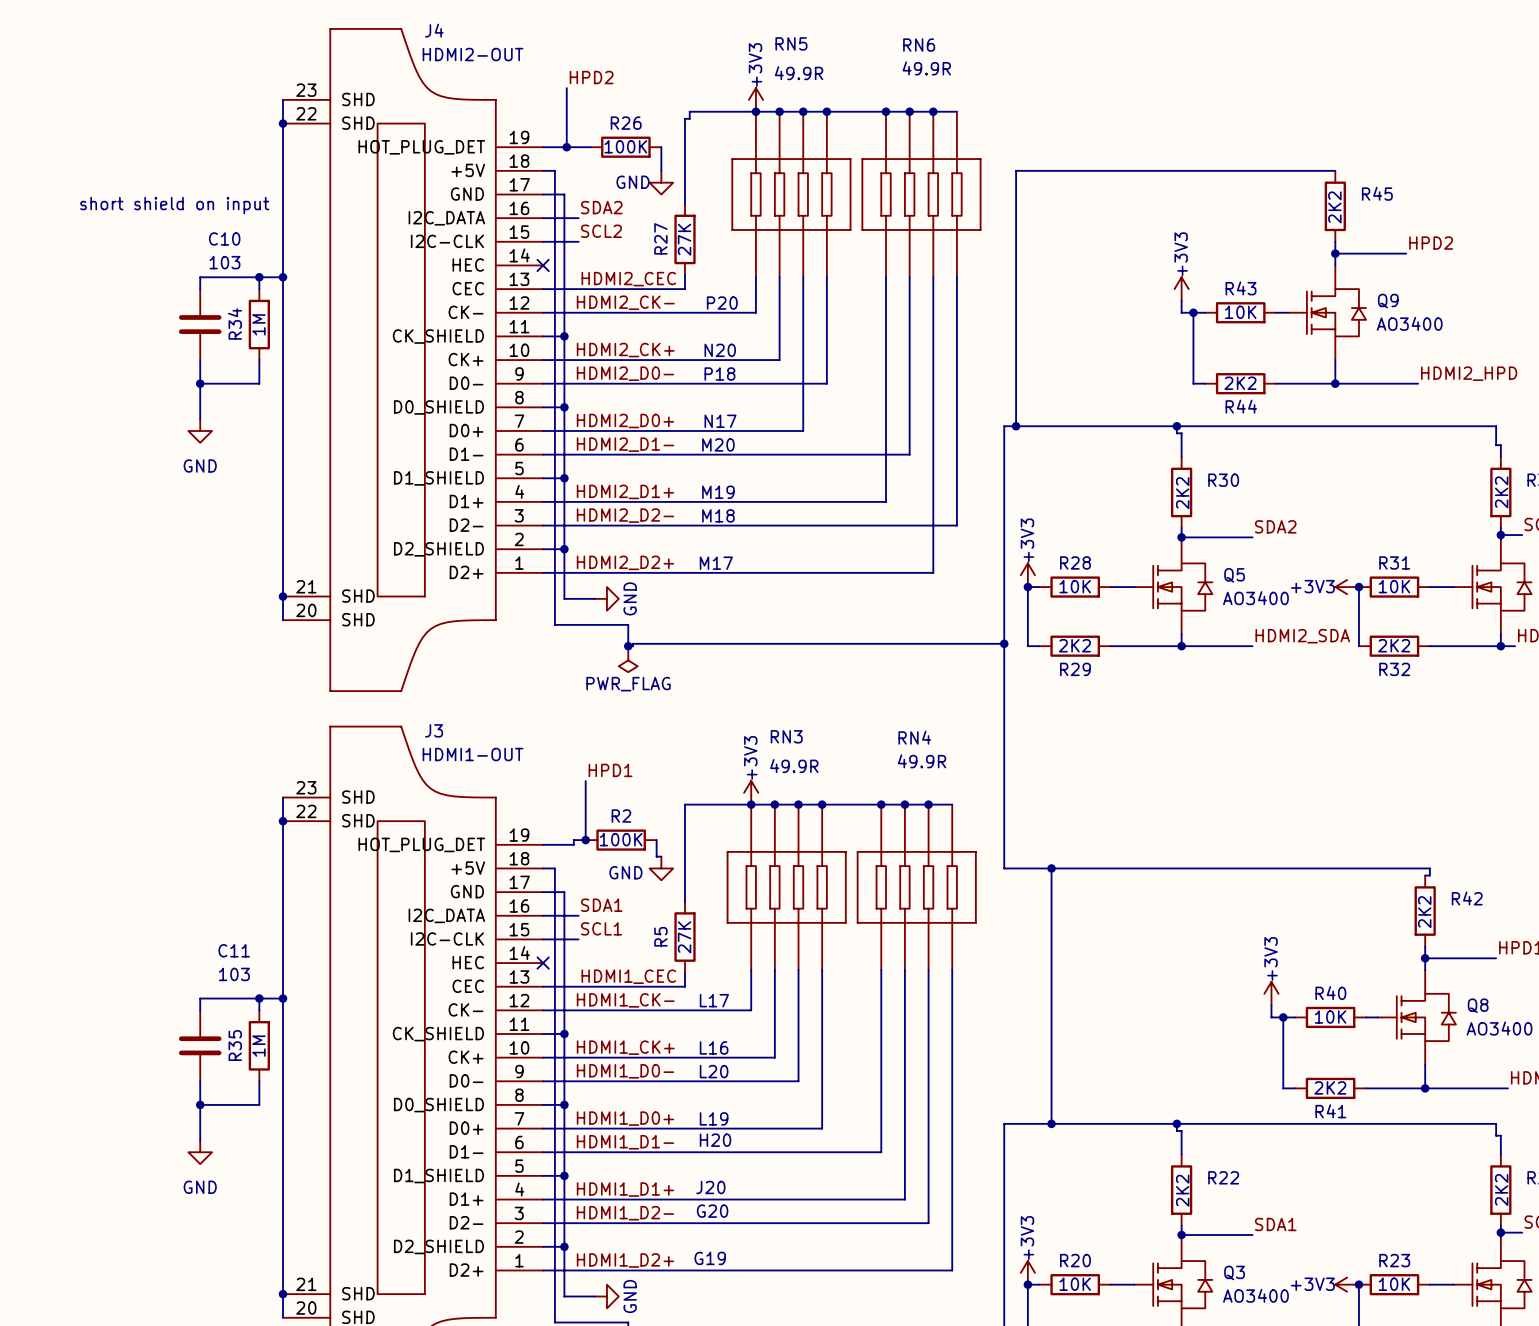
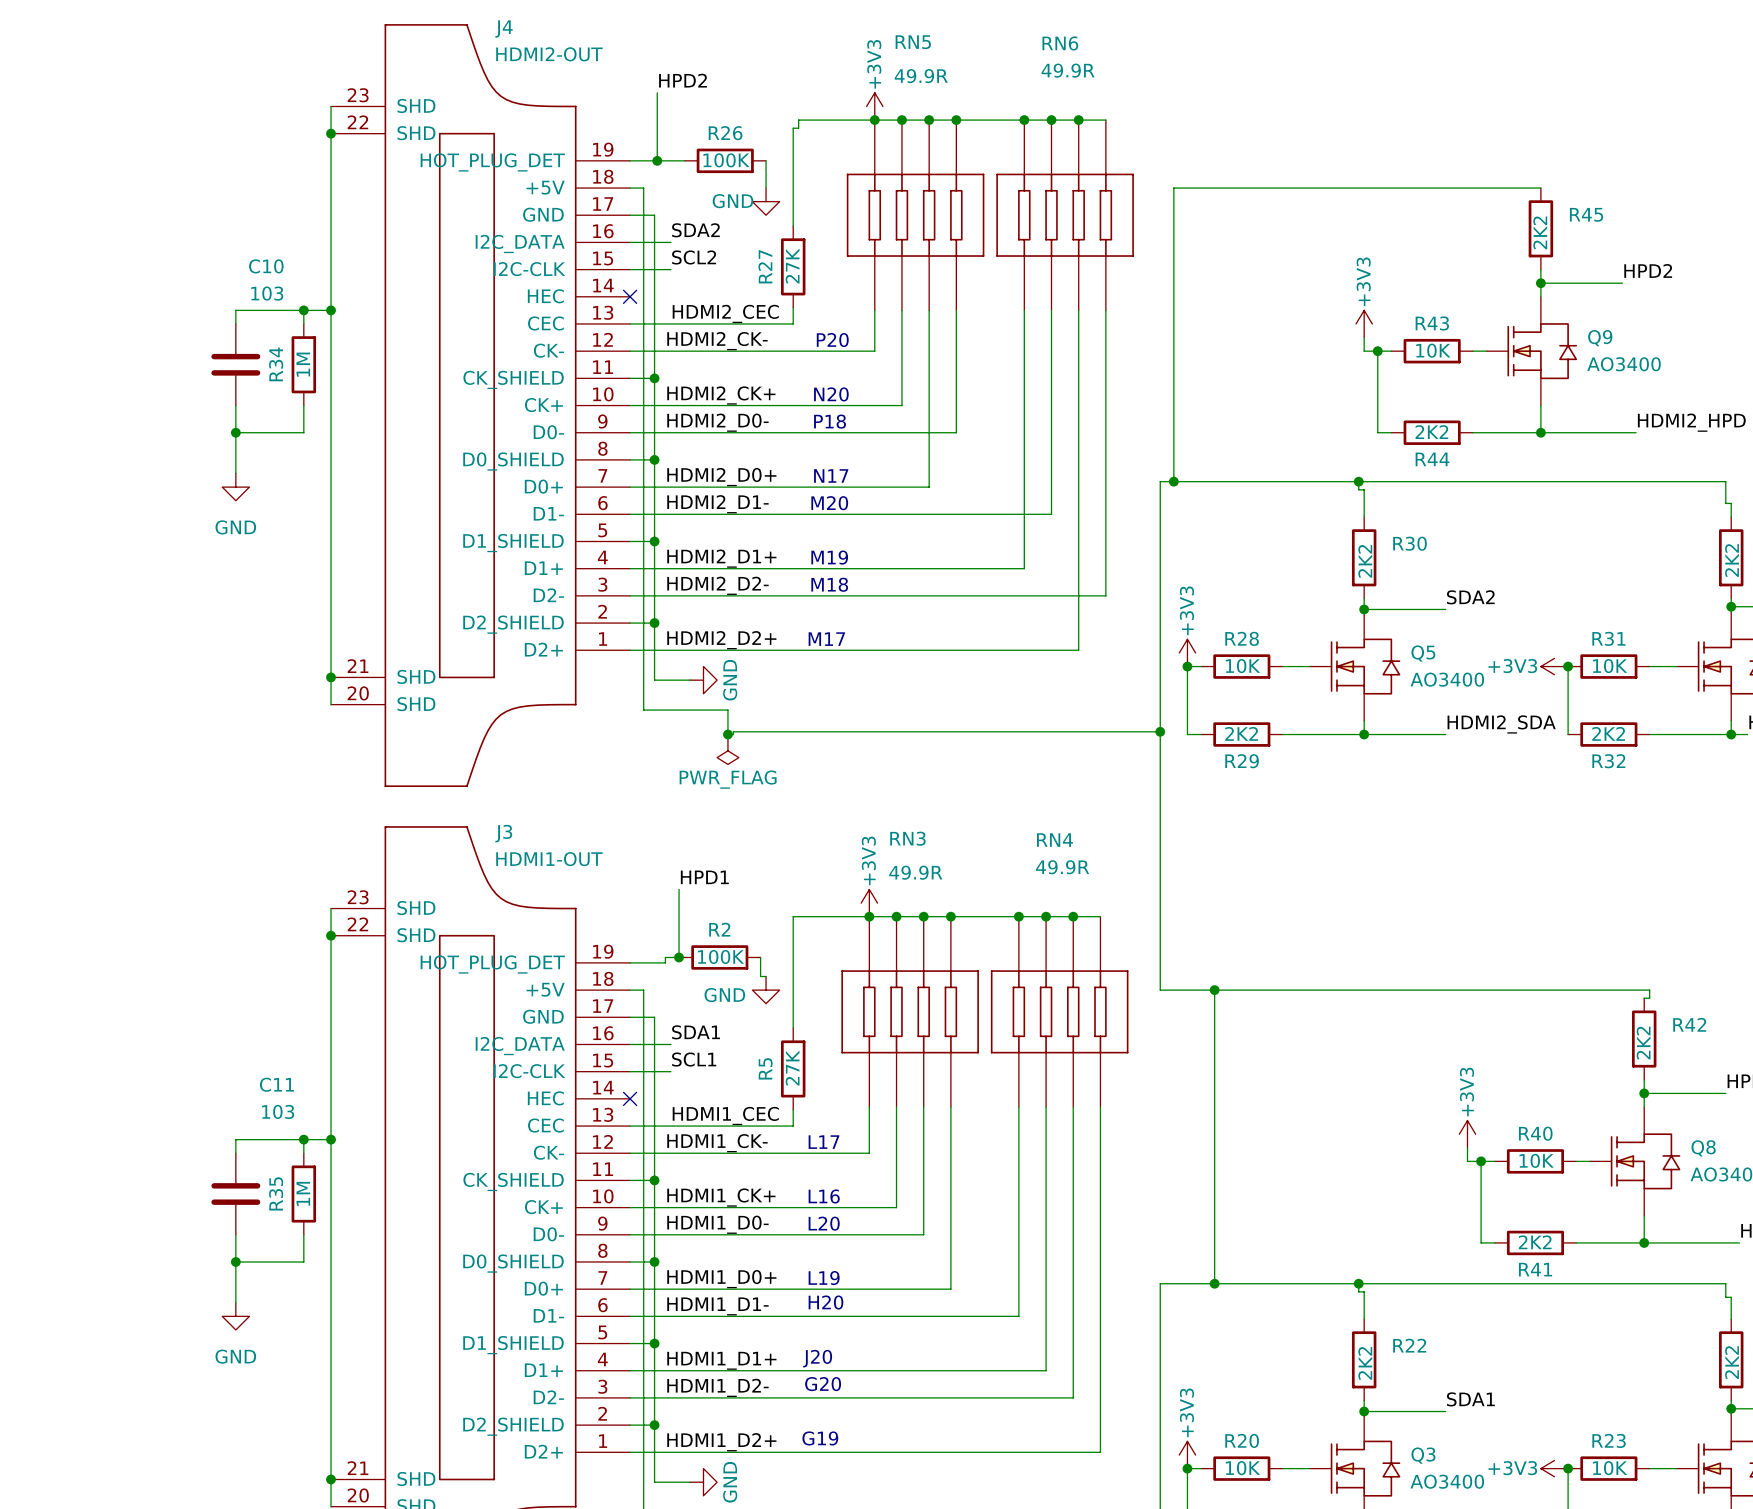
text: short shield on input (174, 205) -> none

